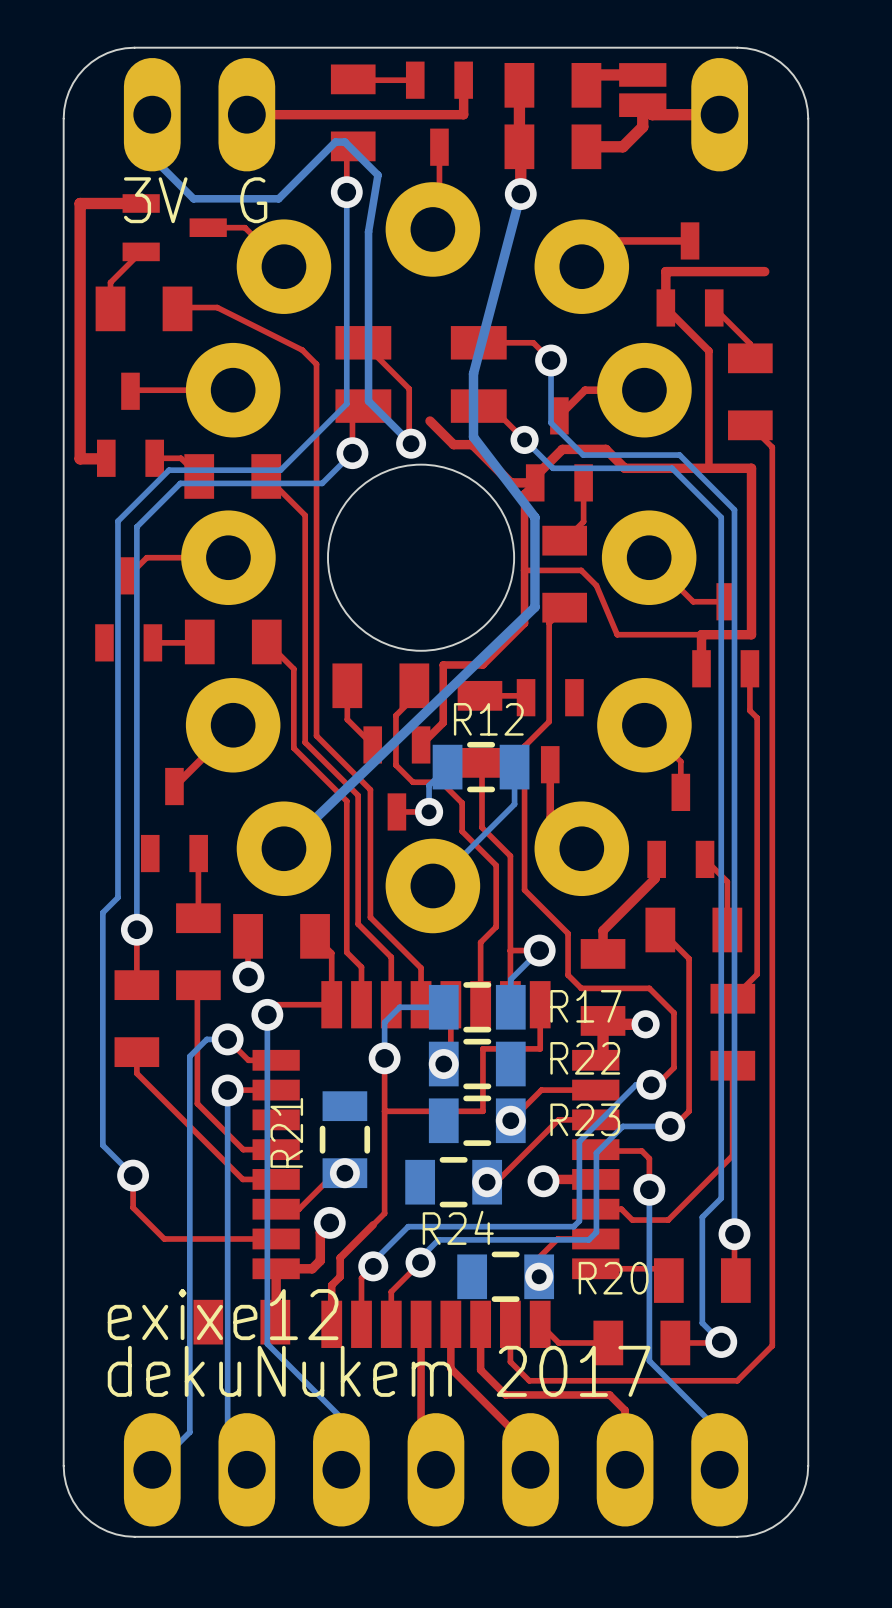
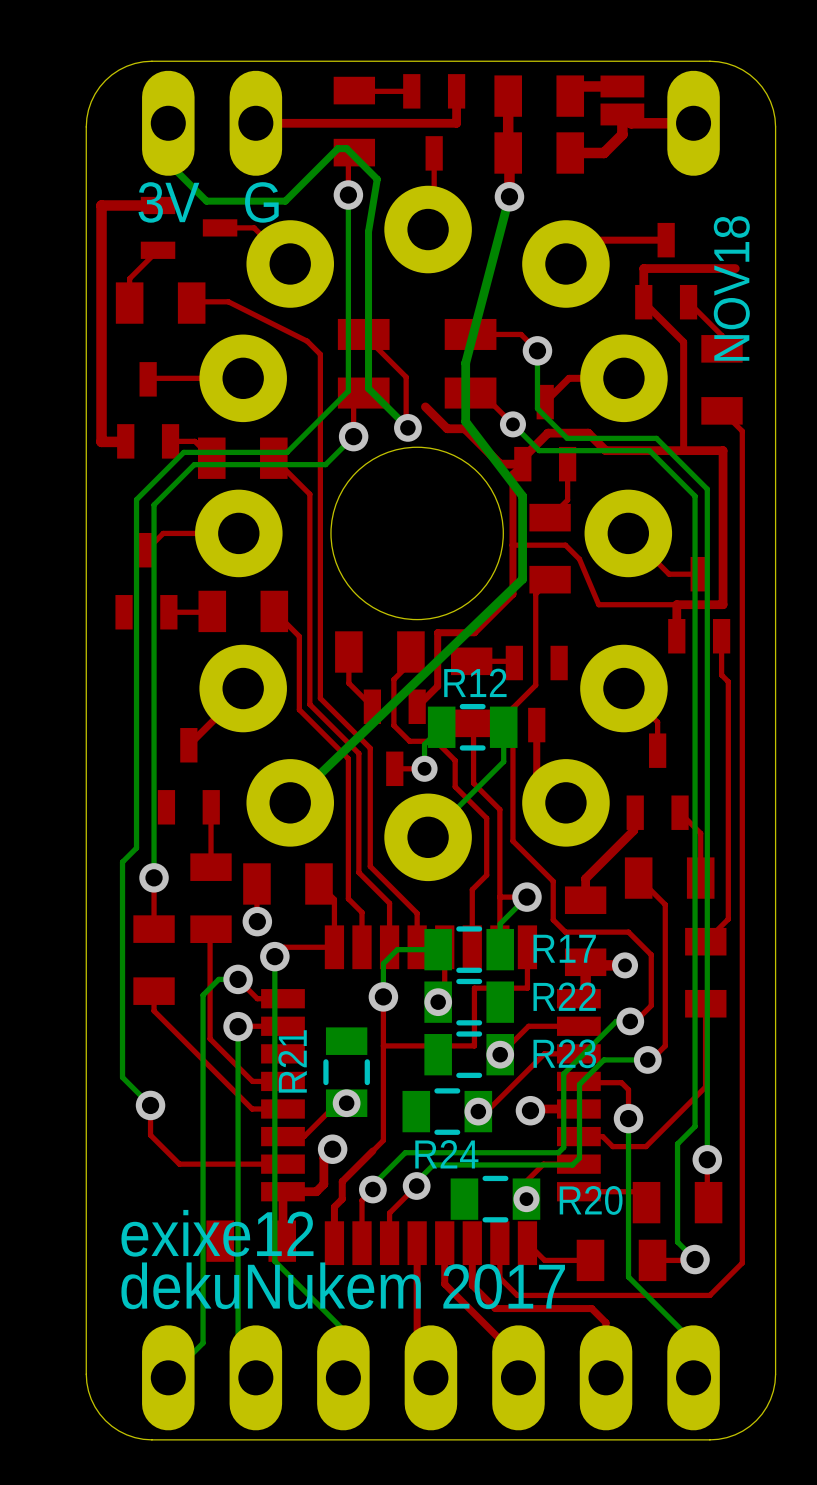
text: none -> NOV18 (731, 288)

